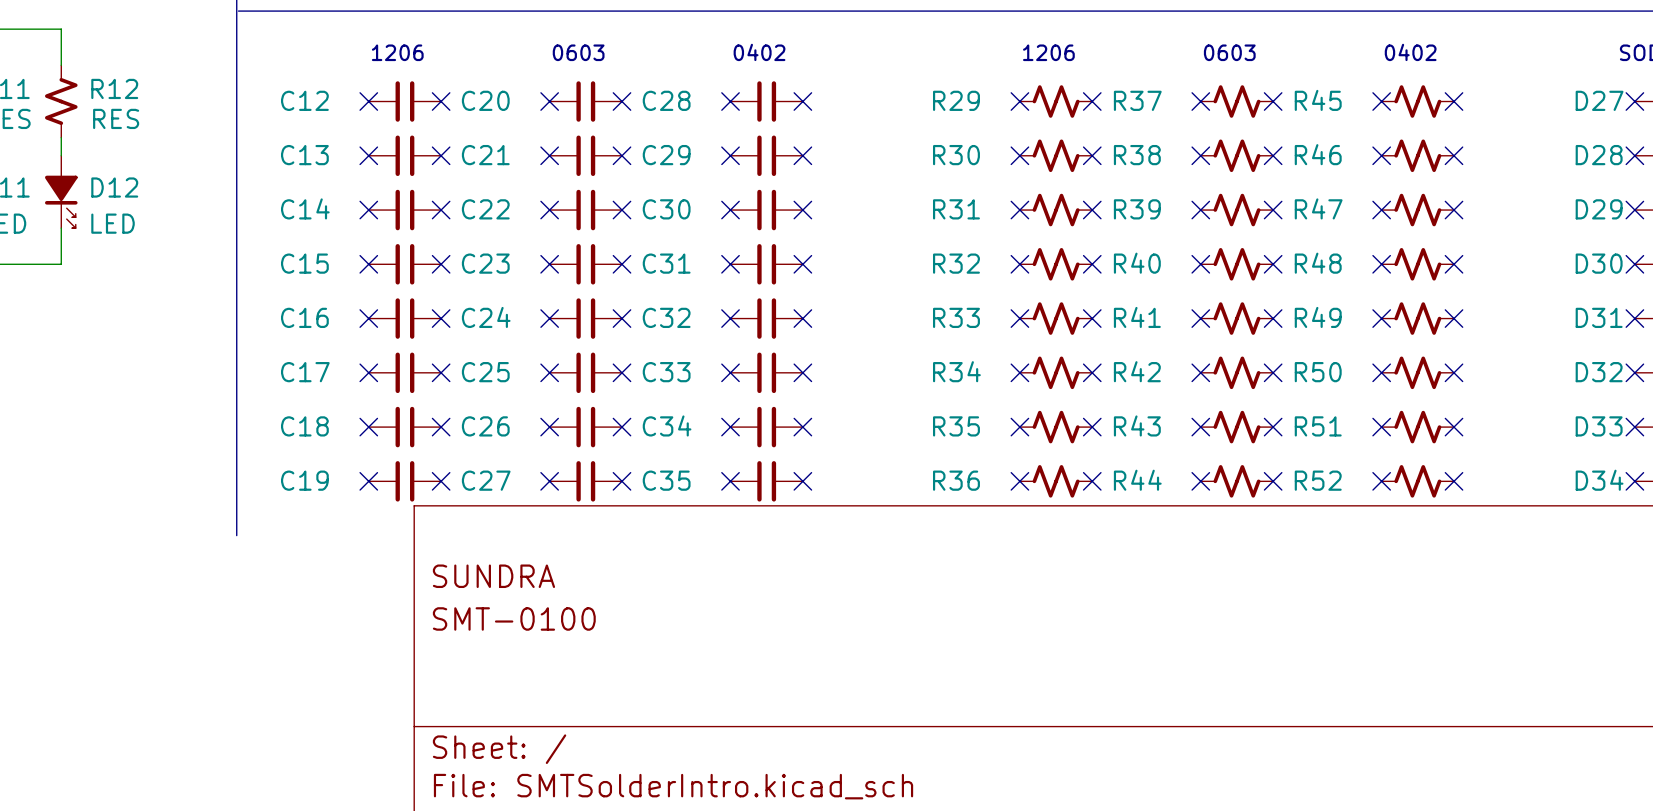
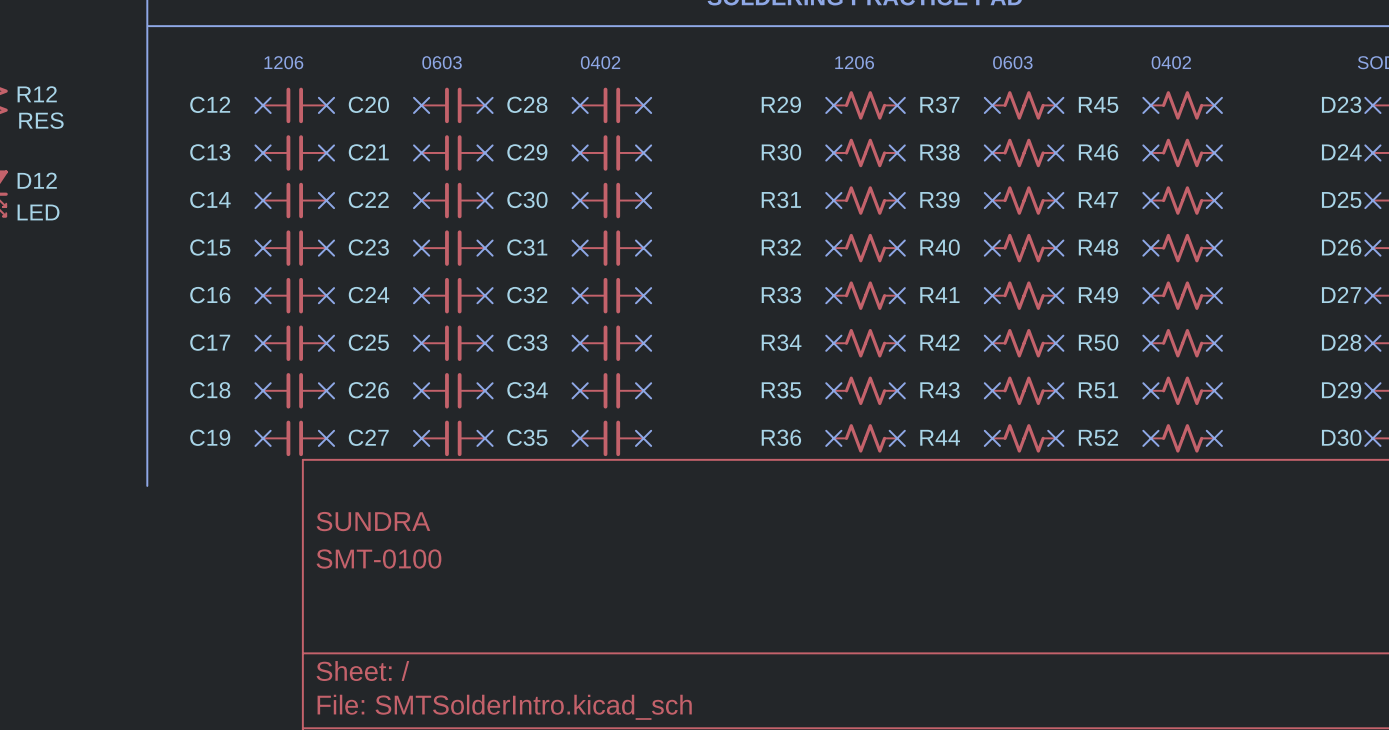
D27 name: D27 (1599, 100) -> D23 (1341, 104)
D28 name: D28 (1599, 155) -> D24 (1341, 152)
D29 name: D29 (1599, 209) -> D25 (1341, 199)
D30 name: D30 (1599, 263) -> D26 (1341, 247)
D31 name: D31 (1599, 317) -> D27 (1341, 294)
D32 name: D32 (1599, 372) -> D28 (1341, 342)
D33 name: D33 (1599, 426) -> D29 (1341, 390)
D34 name: D34 (1599, 480) -> D30 (1341, 437)

